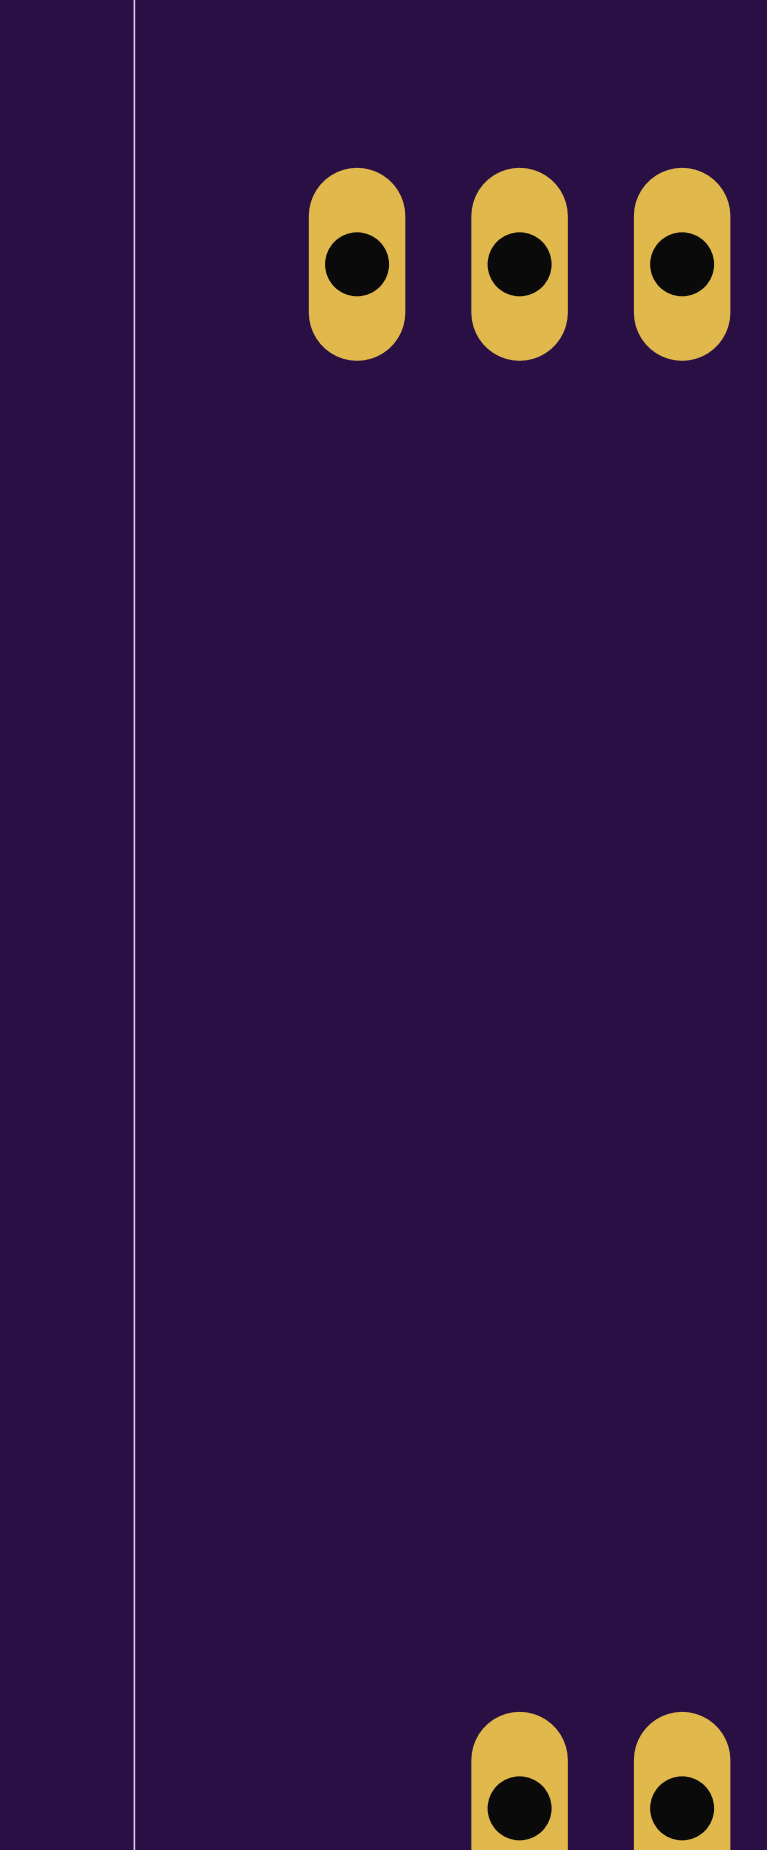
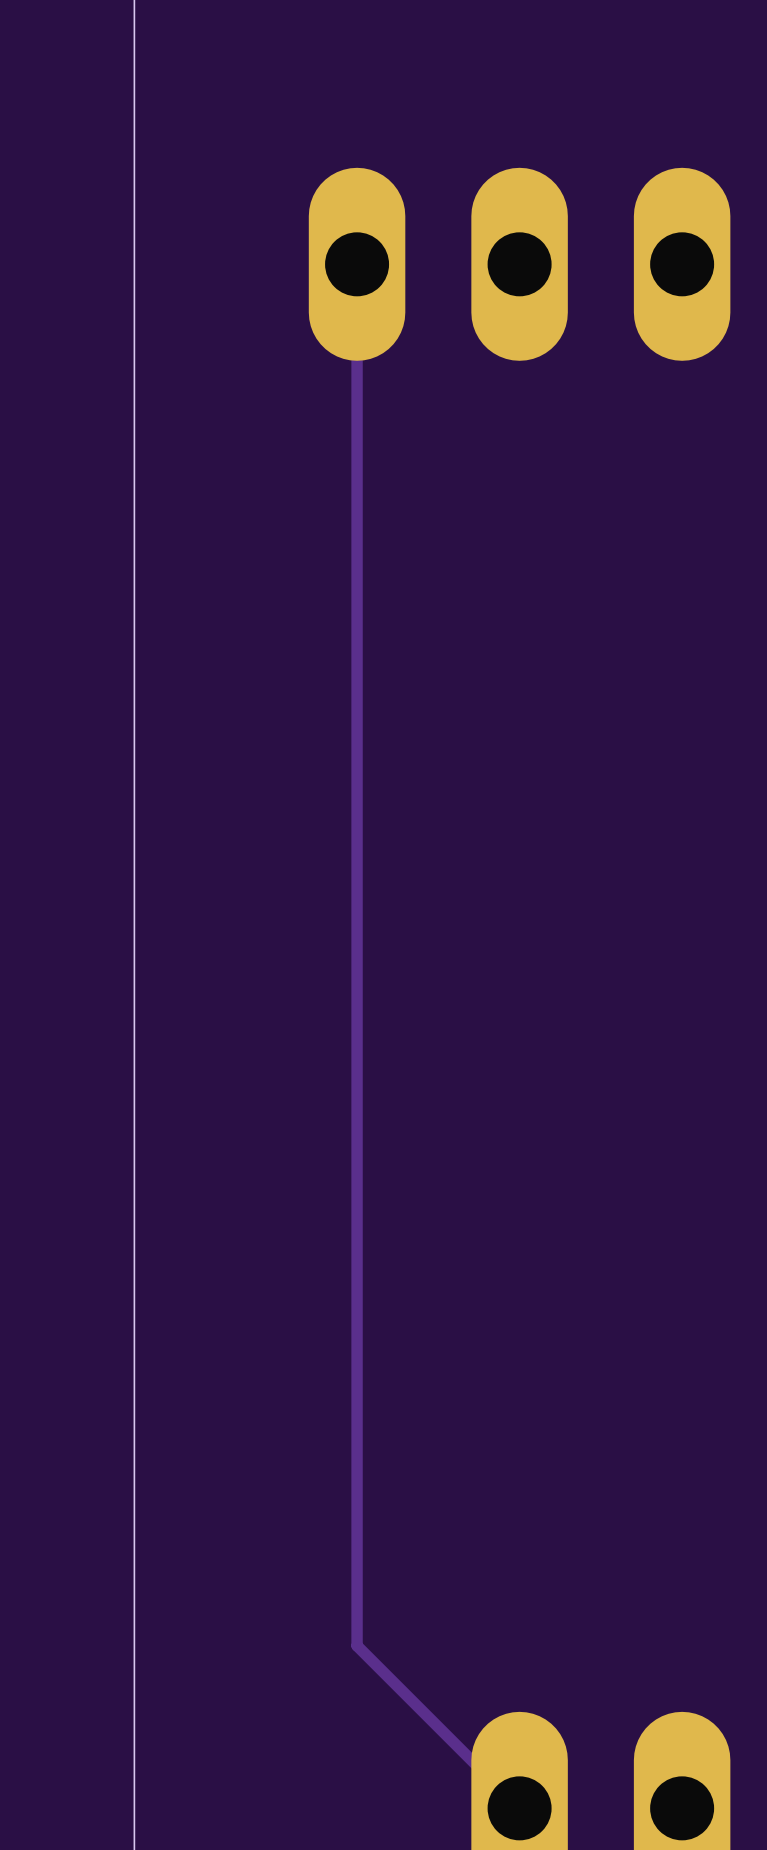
track: none -> (357, 264) (357, 1645) (519, 1808)

